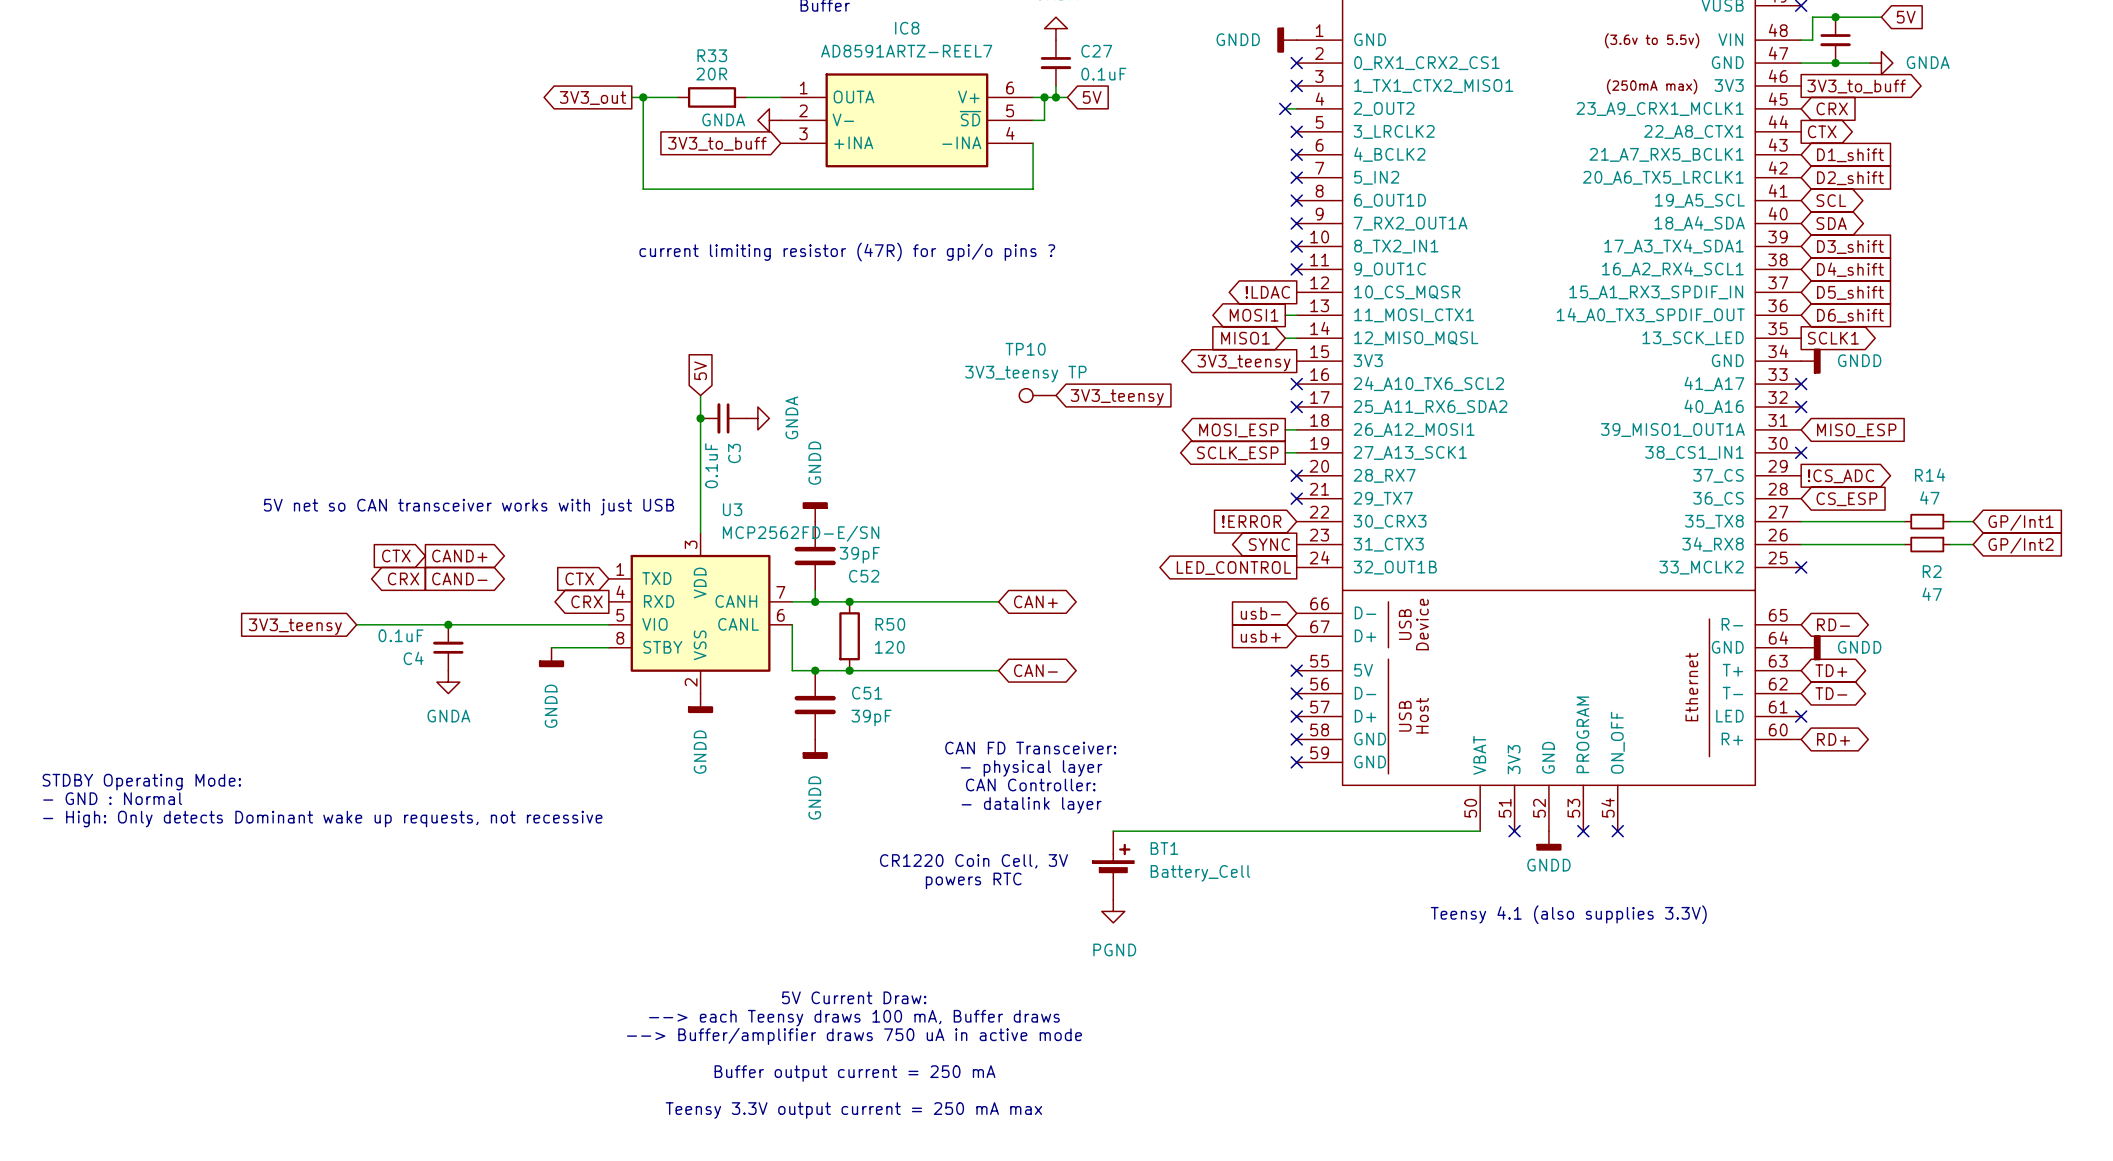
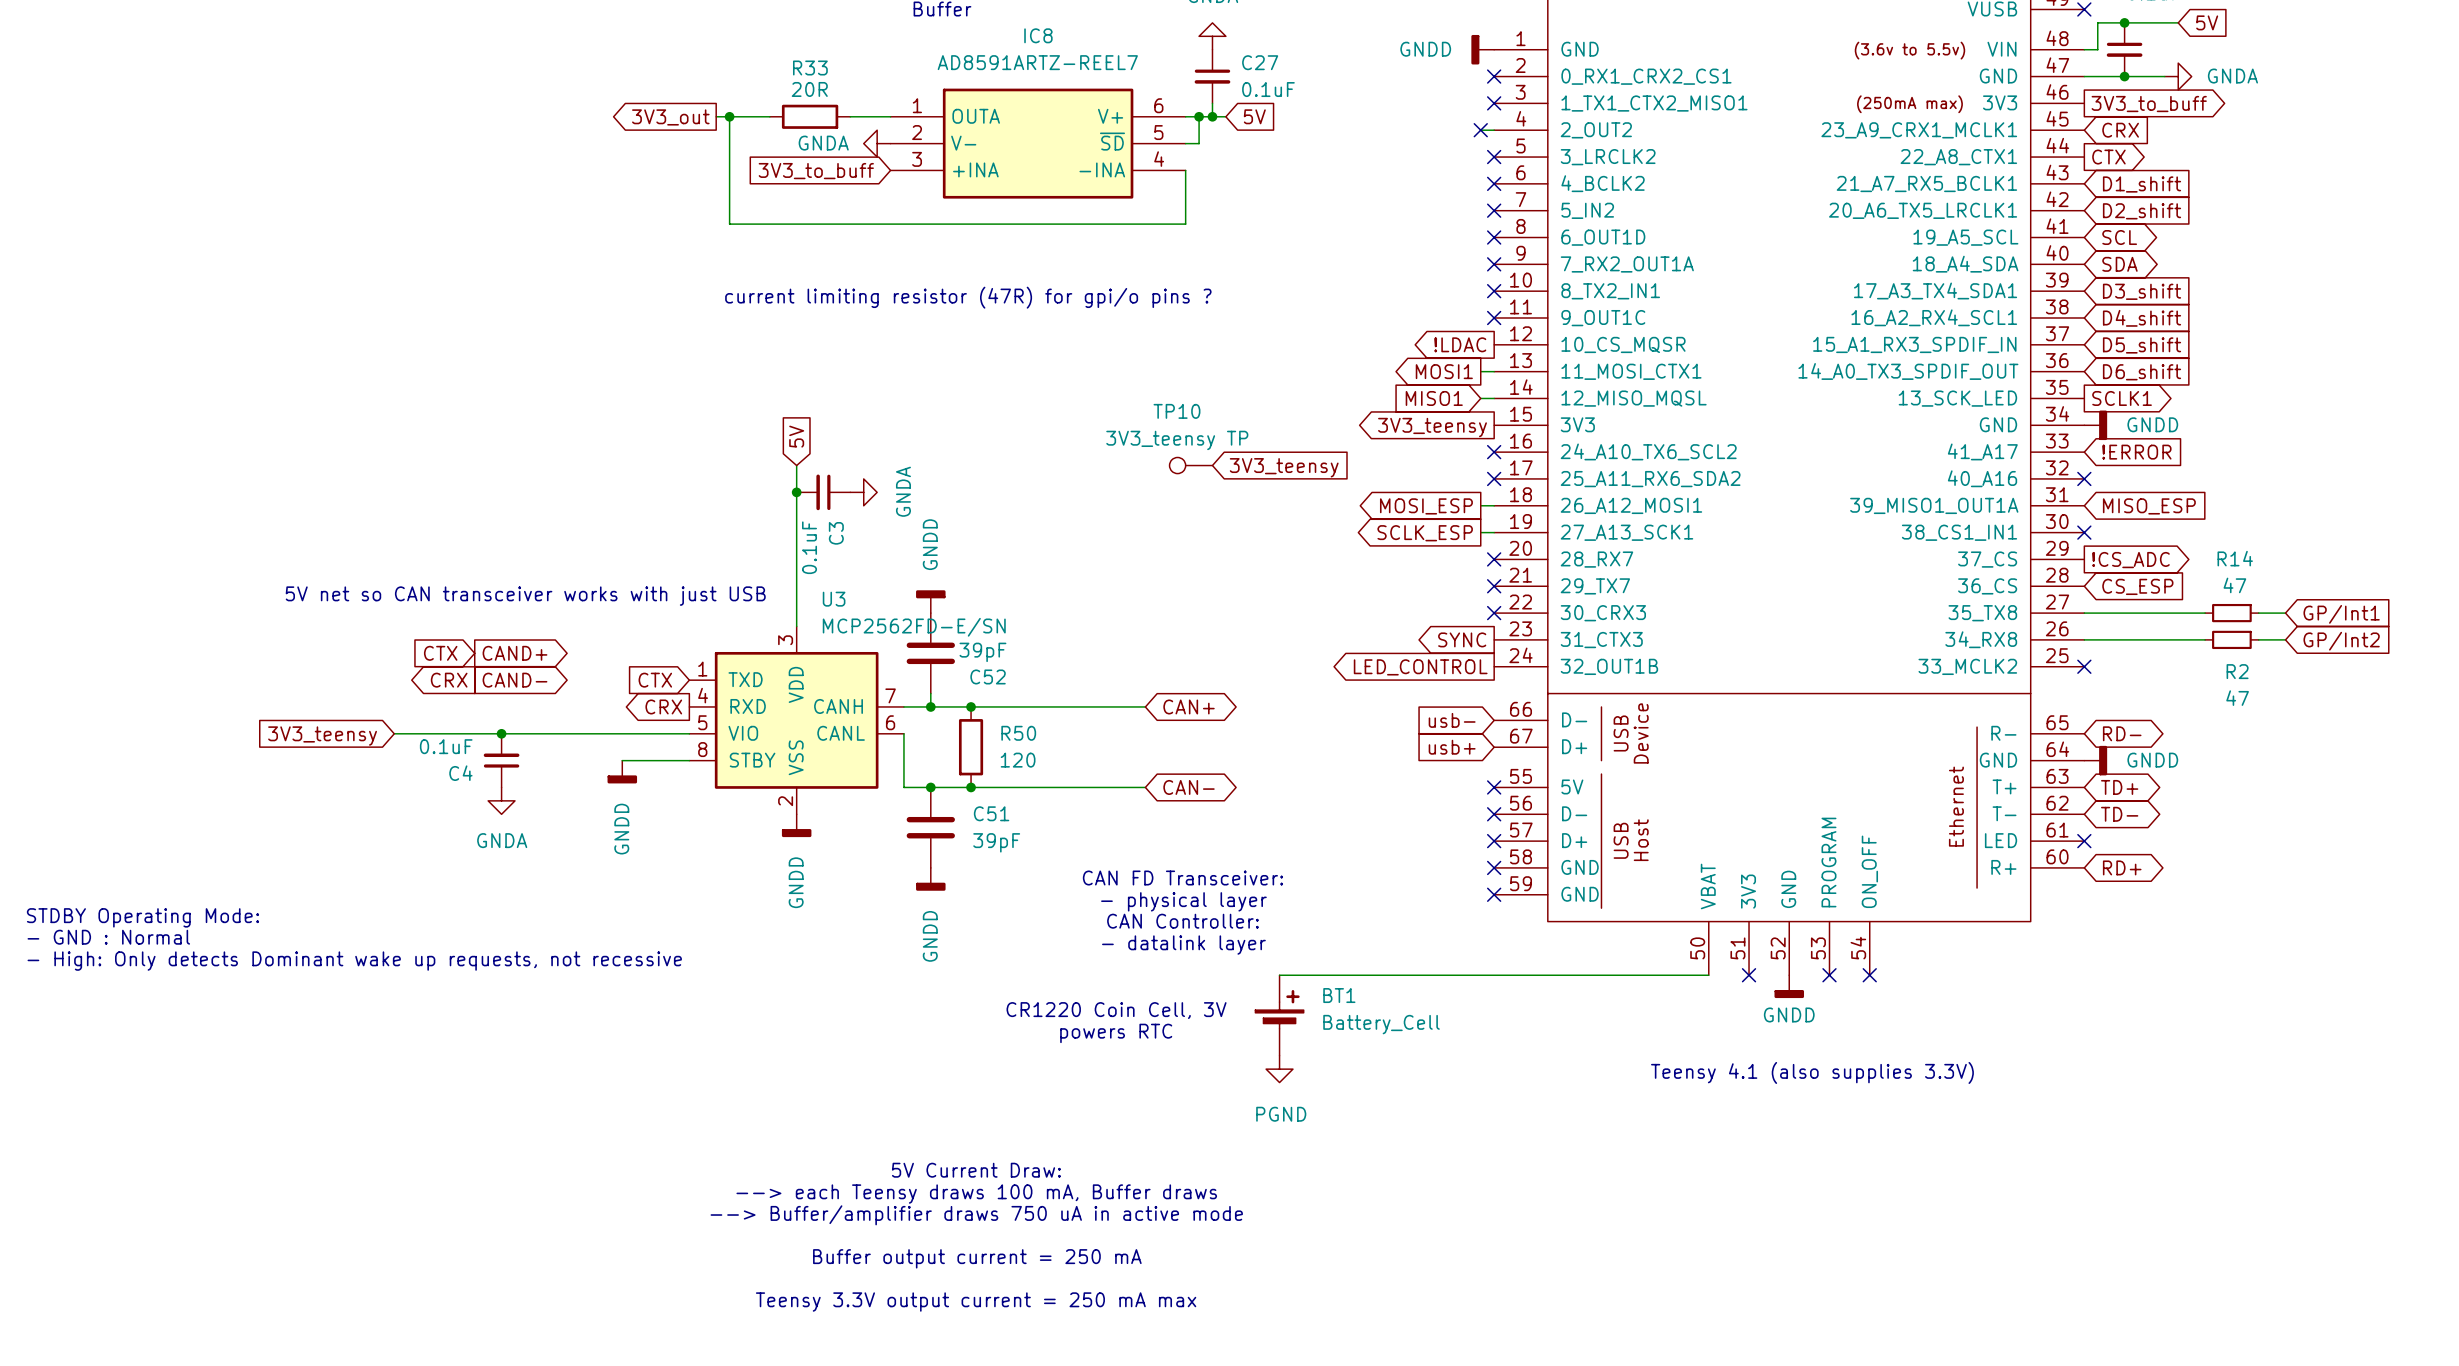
no-connect mark: (1801, 384) -> none
global label: none -> !ERROR (2136, 452)
global label: !ERROR (1251, 521) -> none
no-connect mark: none -> (1494, 613)

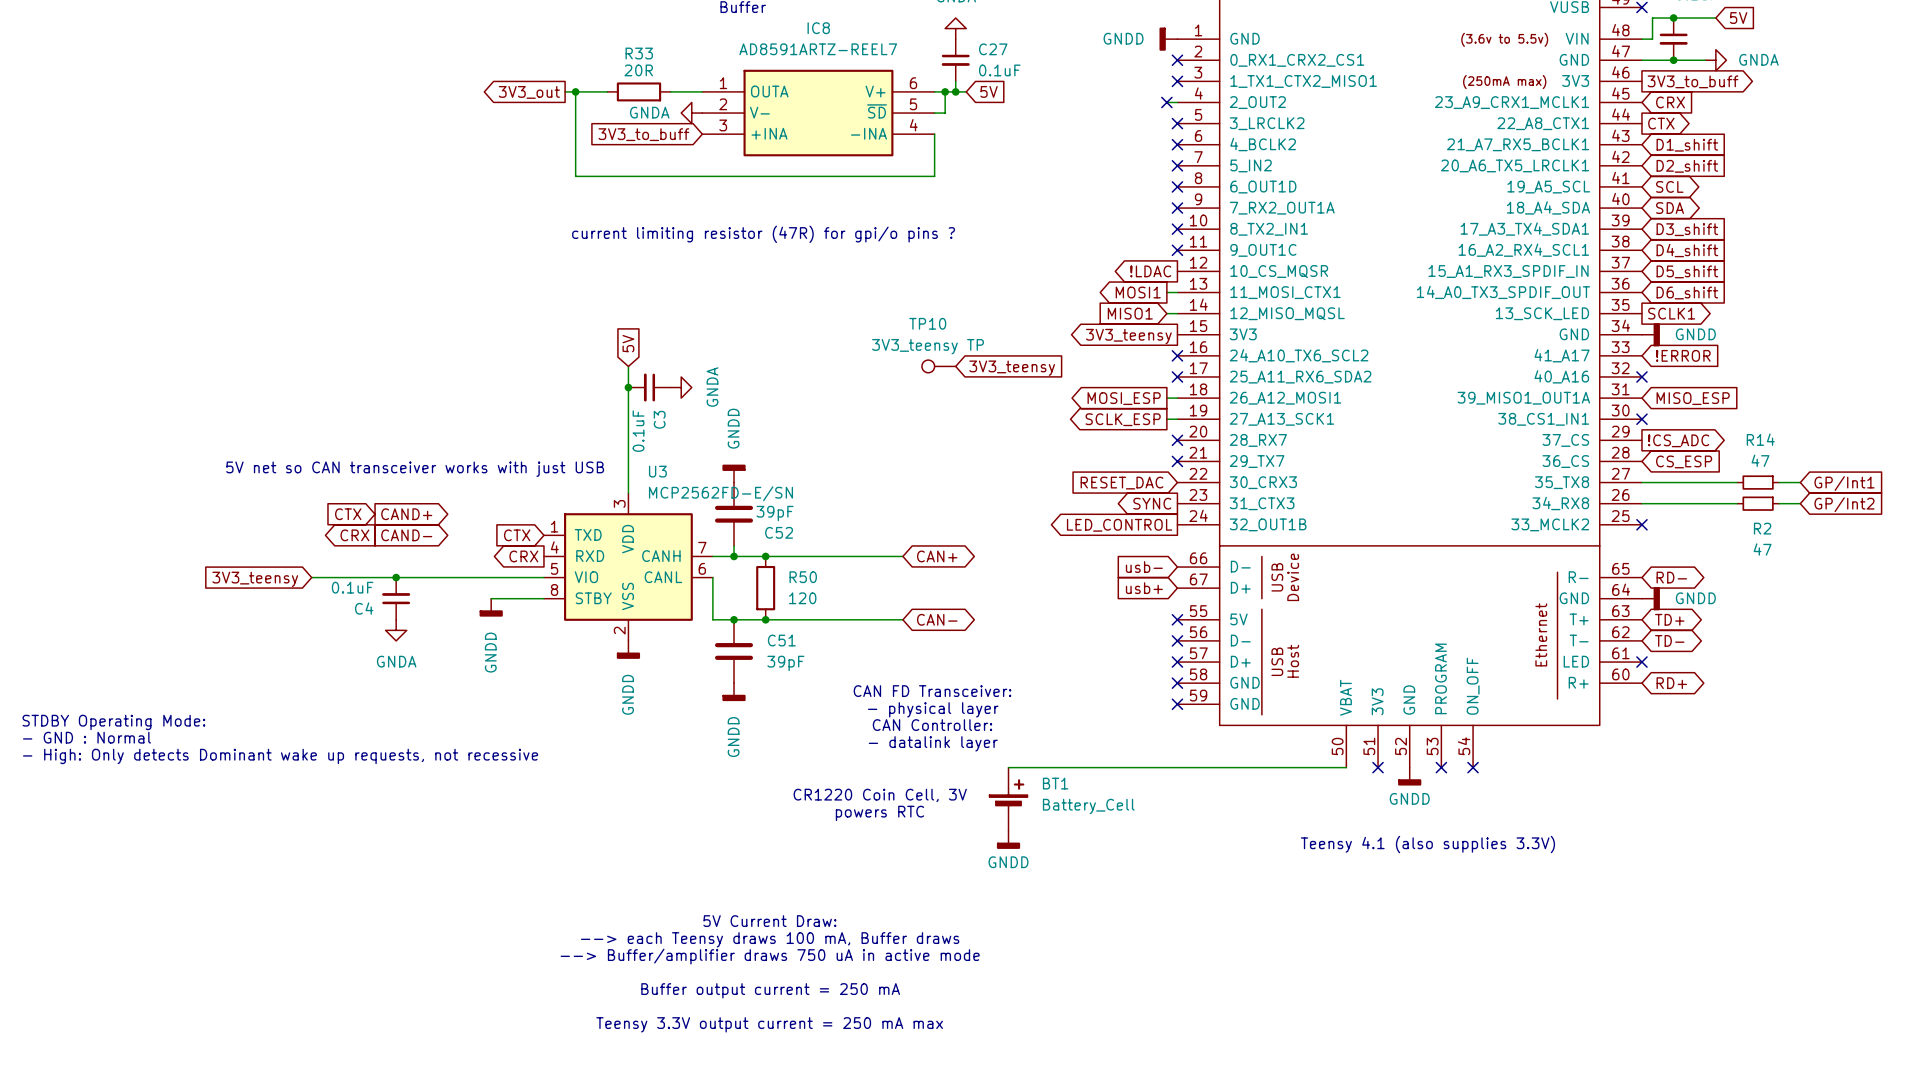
global label: none -> RESET_DAC (1121, 483)
no-connect mark: (1494, 613) -> none
power symbol: PGND (1279, 1069) -> GNDD (1008, 839)

